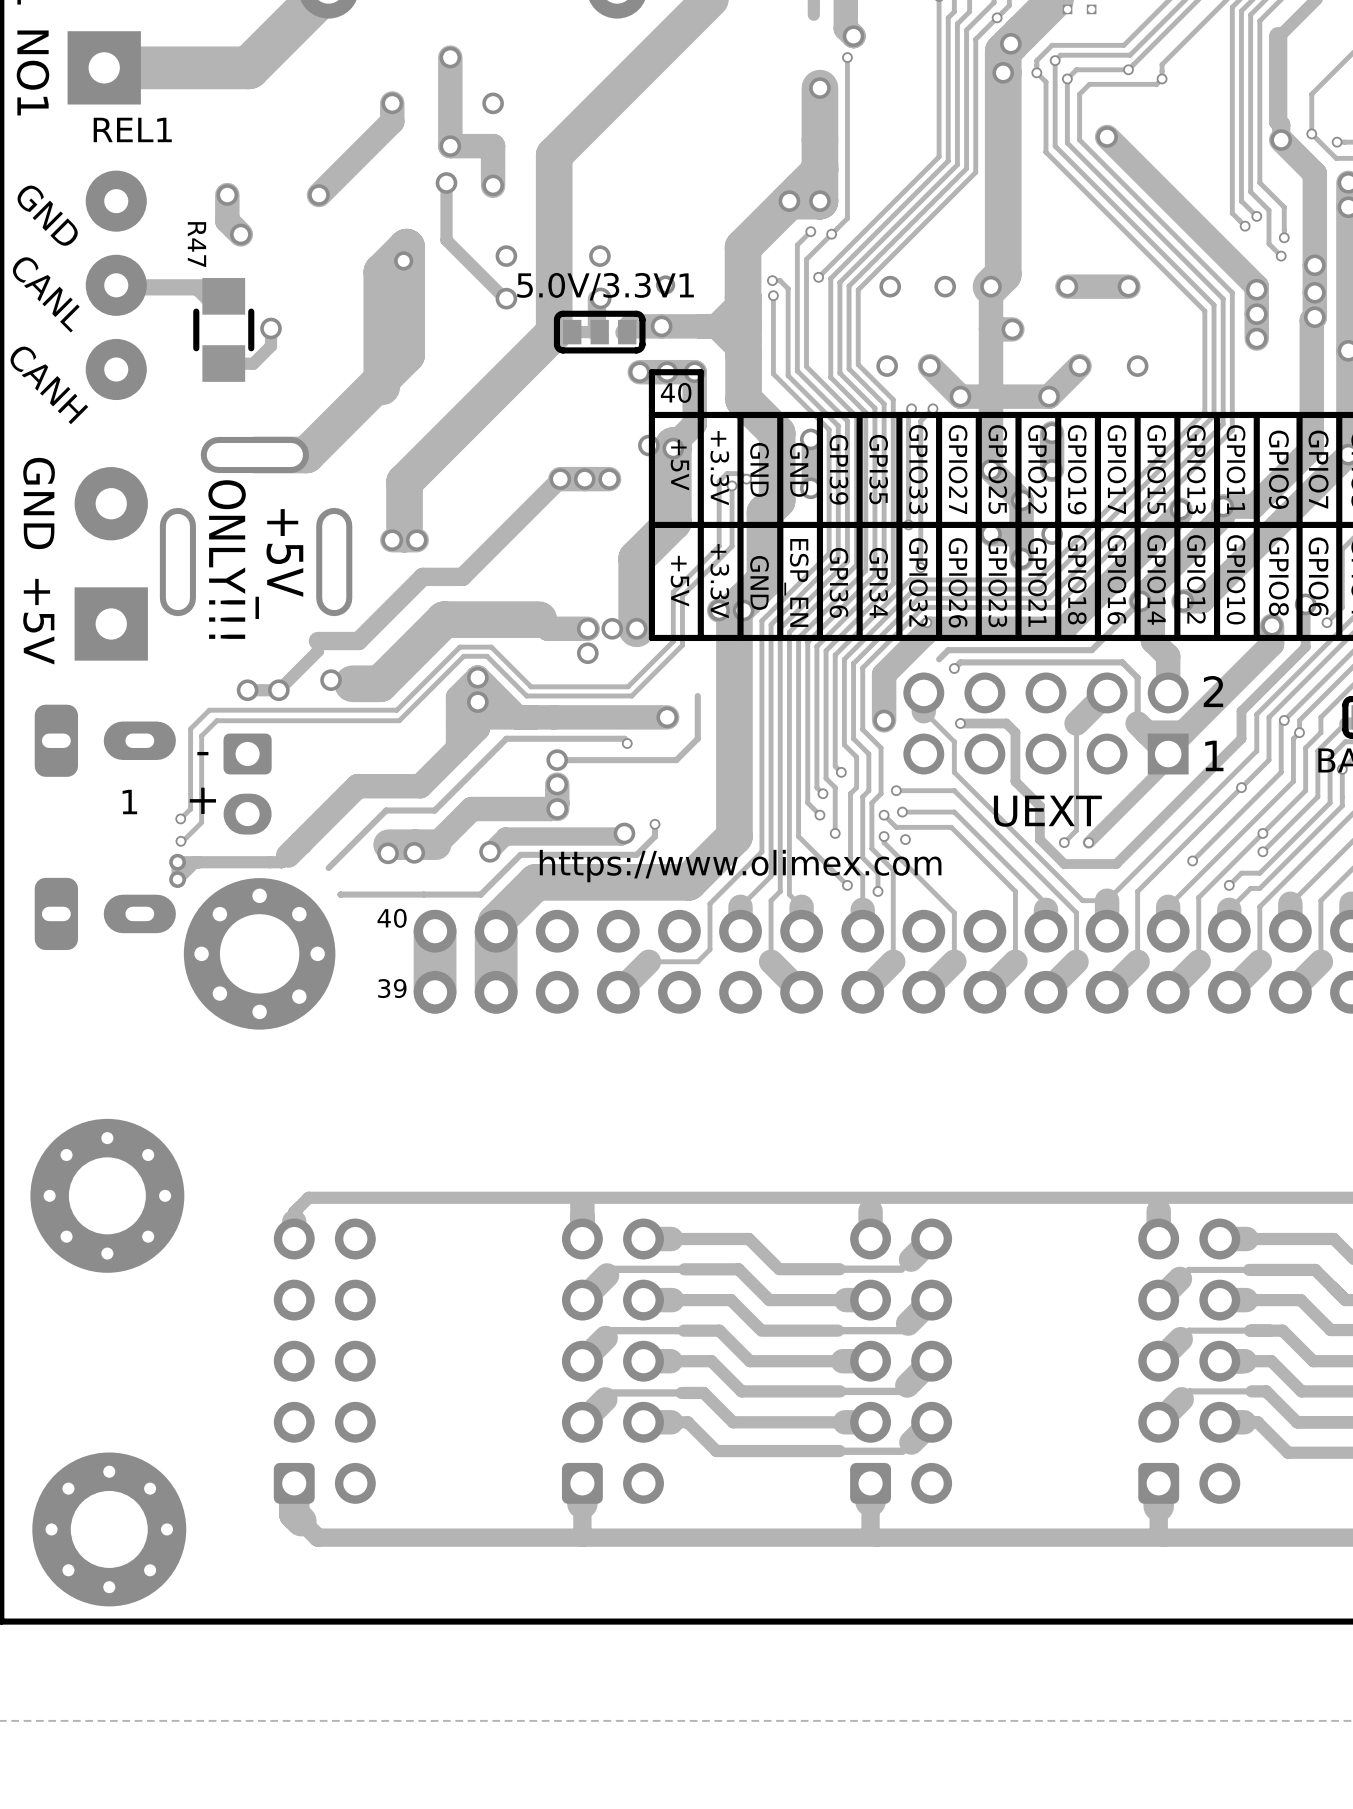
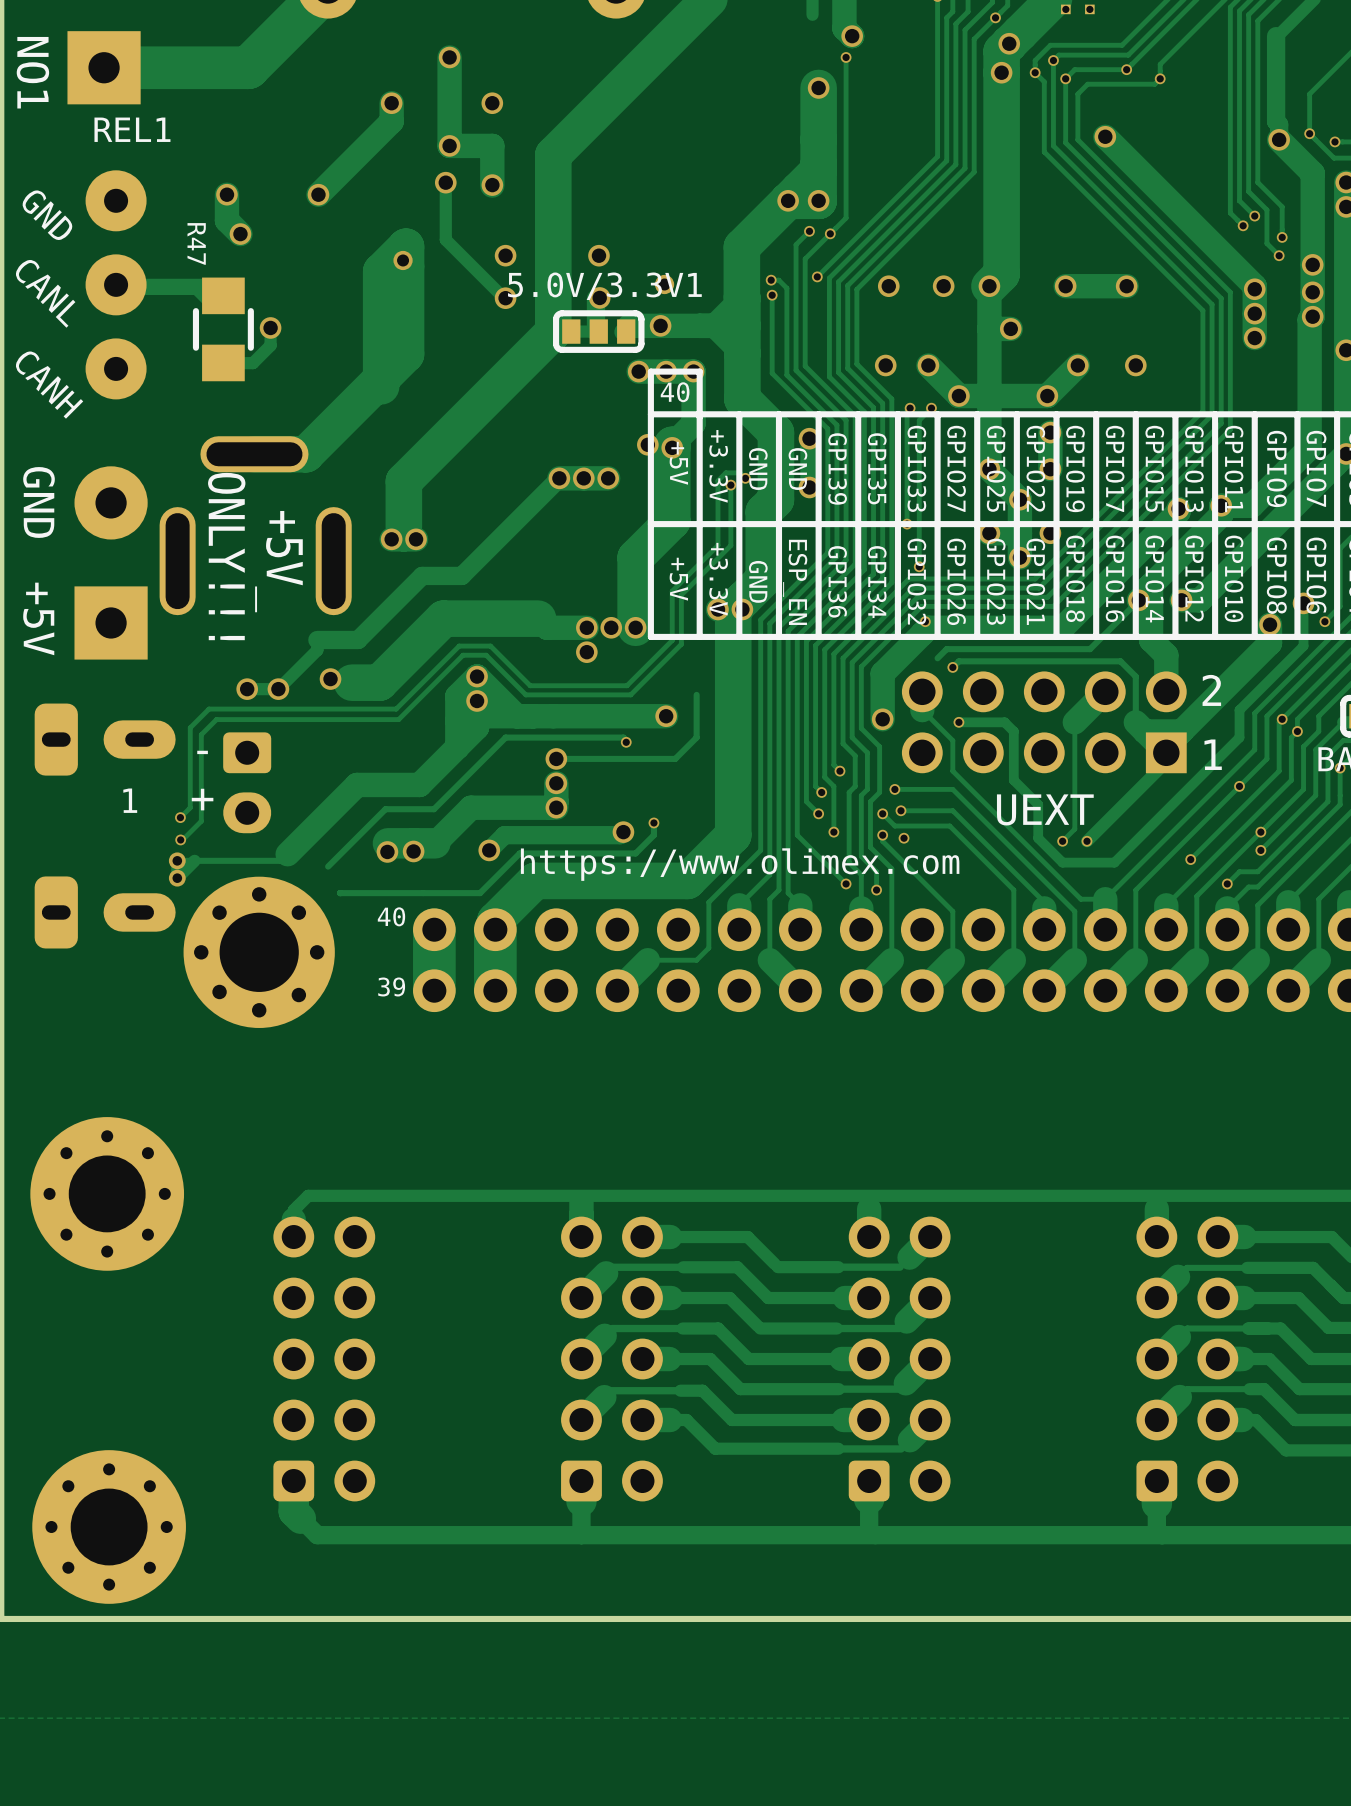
track width: thick (288, 855) (281, 862) (177, 862) -> thin (287, 854) (281, 860) (177, 860)

